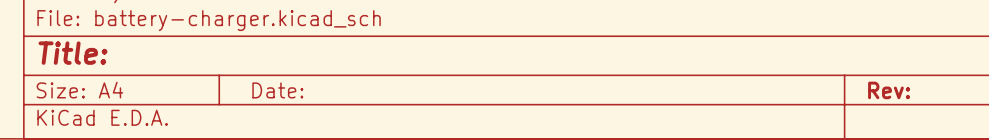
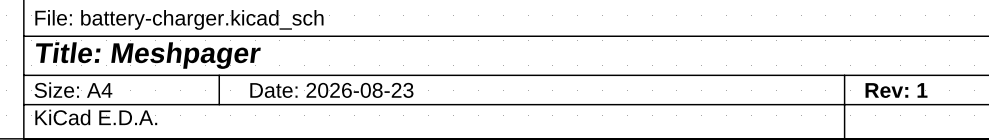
title block: Title: (73, 53) -> Title: Meshpager (148, 55)
title block: Date: (277, 90) -> Date: 2026-08-23 (331, 90)
title block: Rev: (889, 90) -> Rev: 1 (896, 90)

